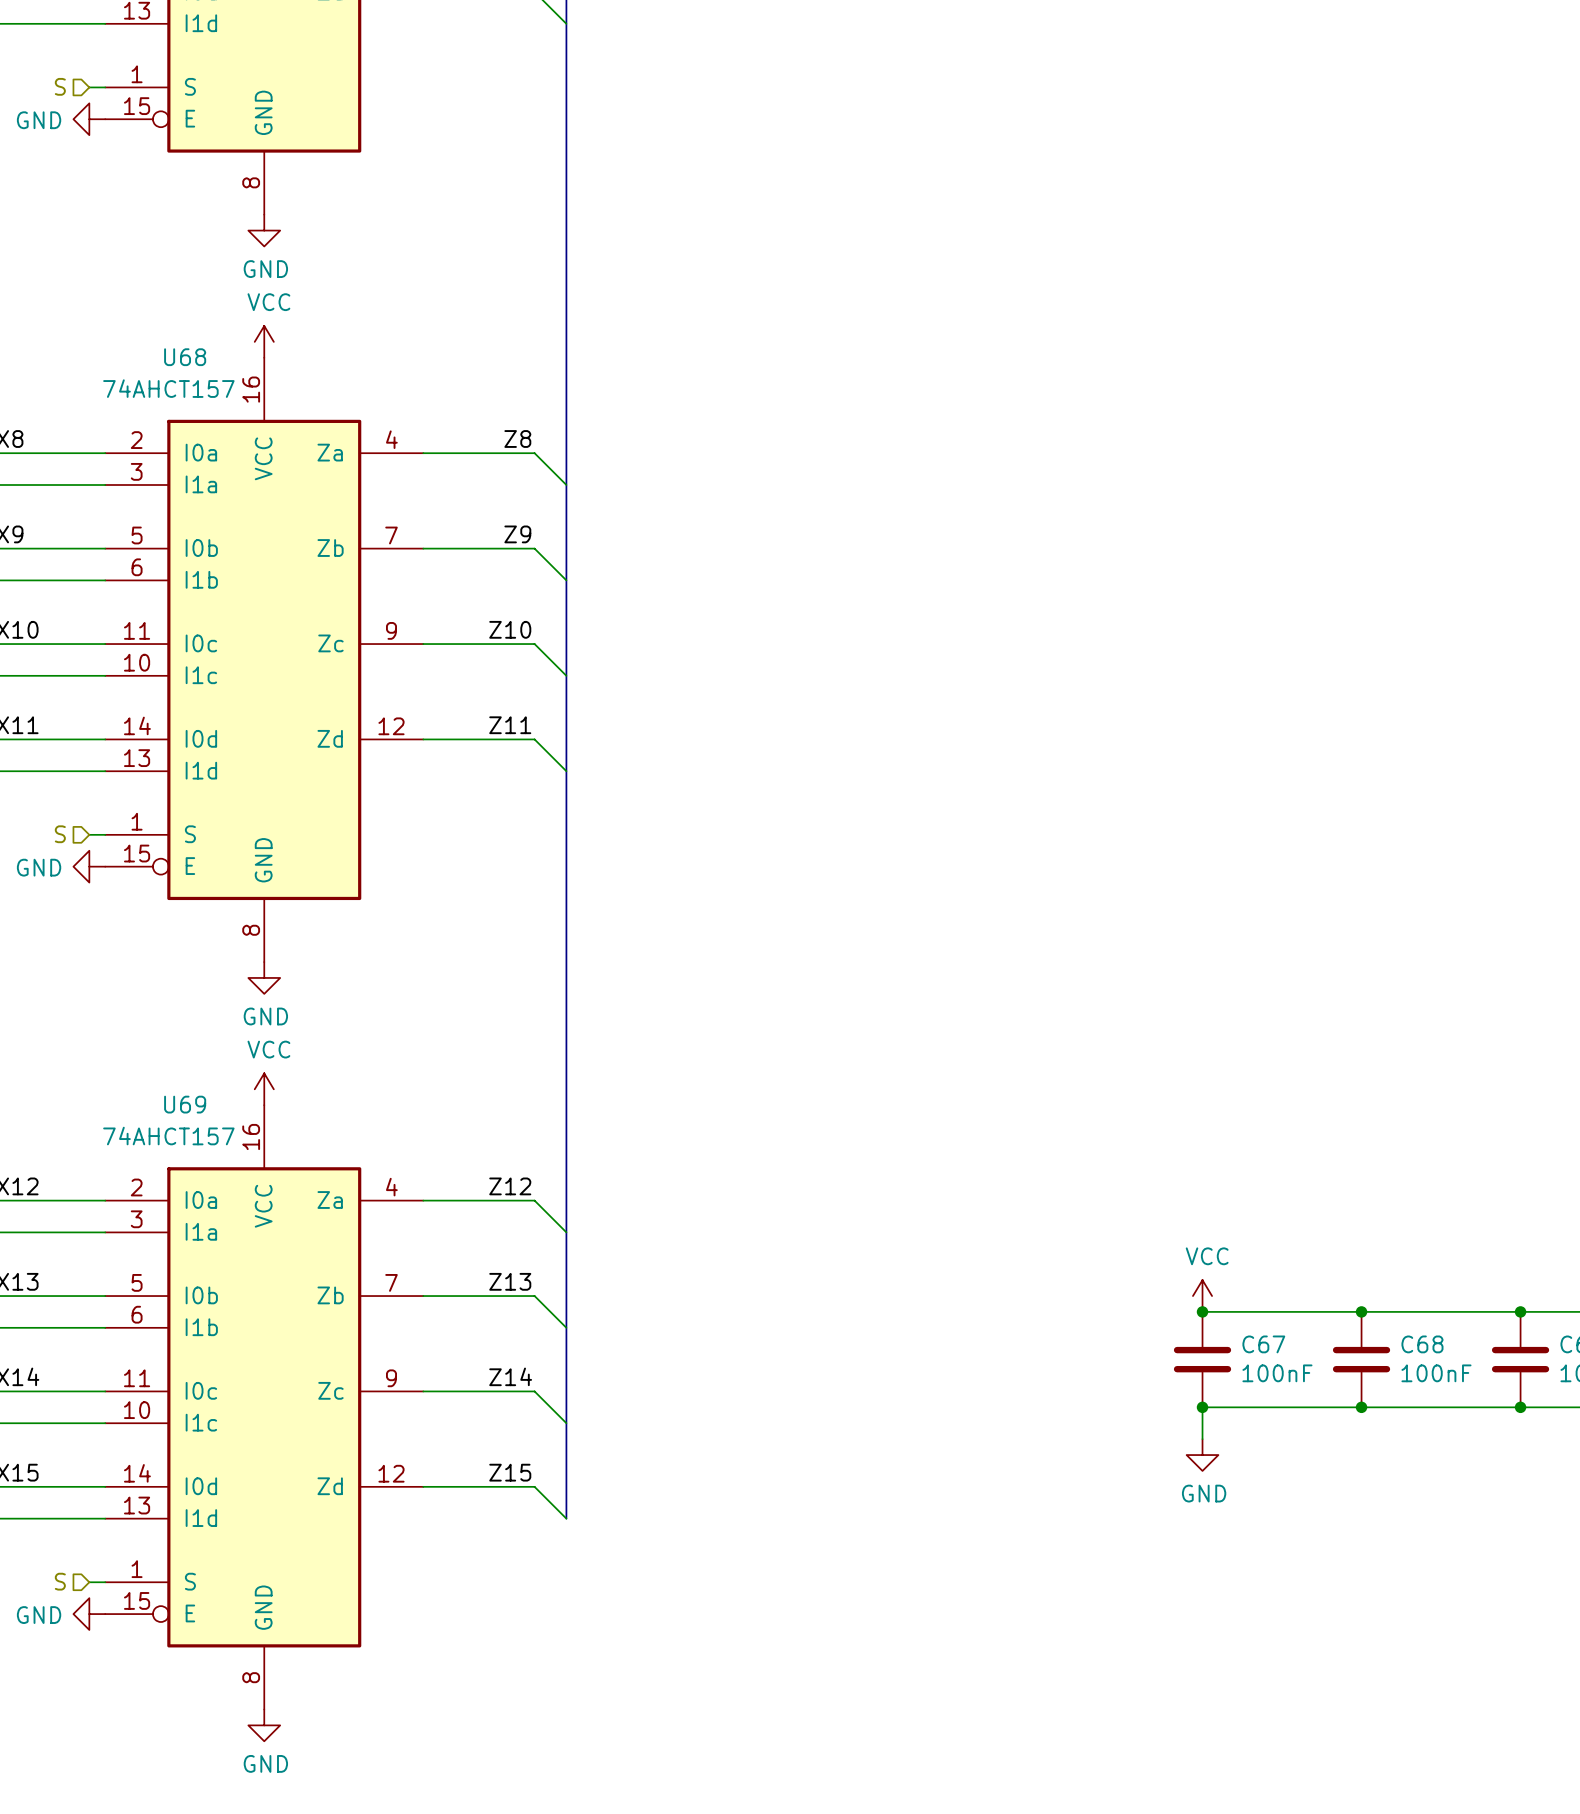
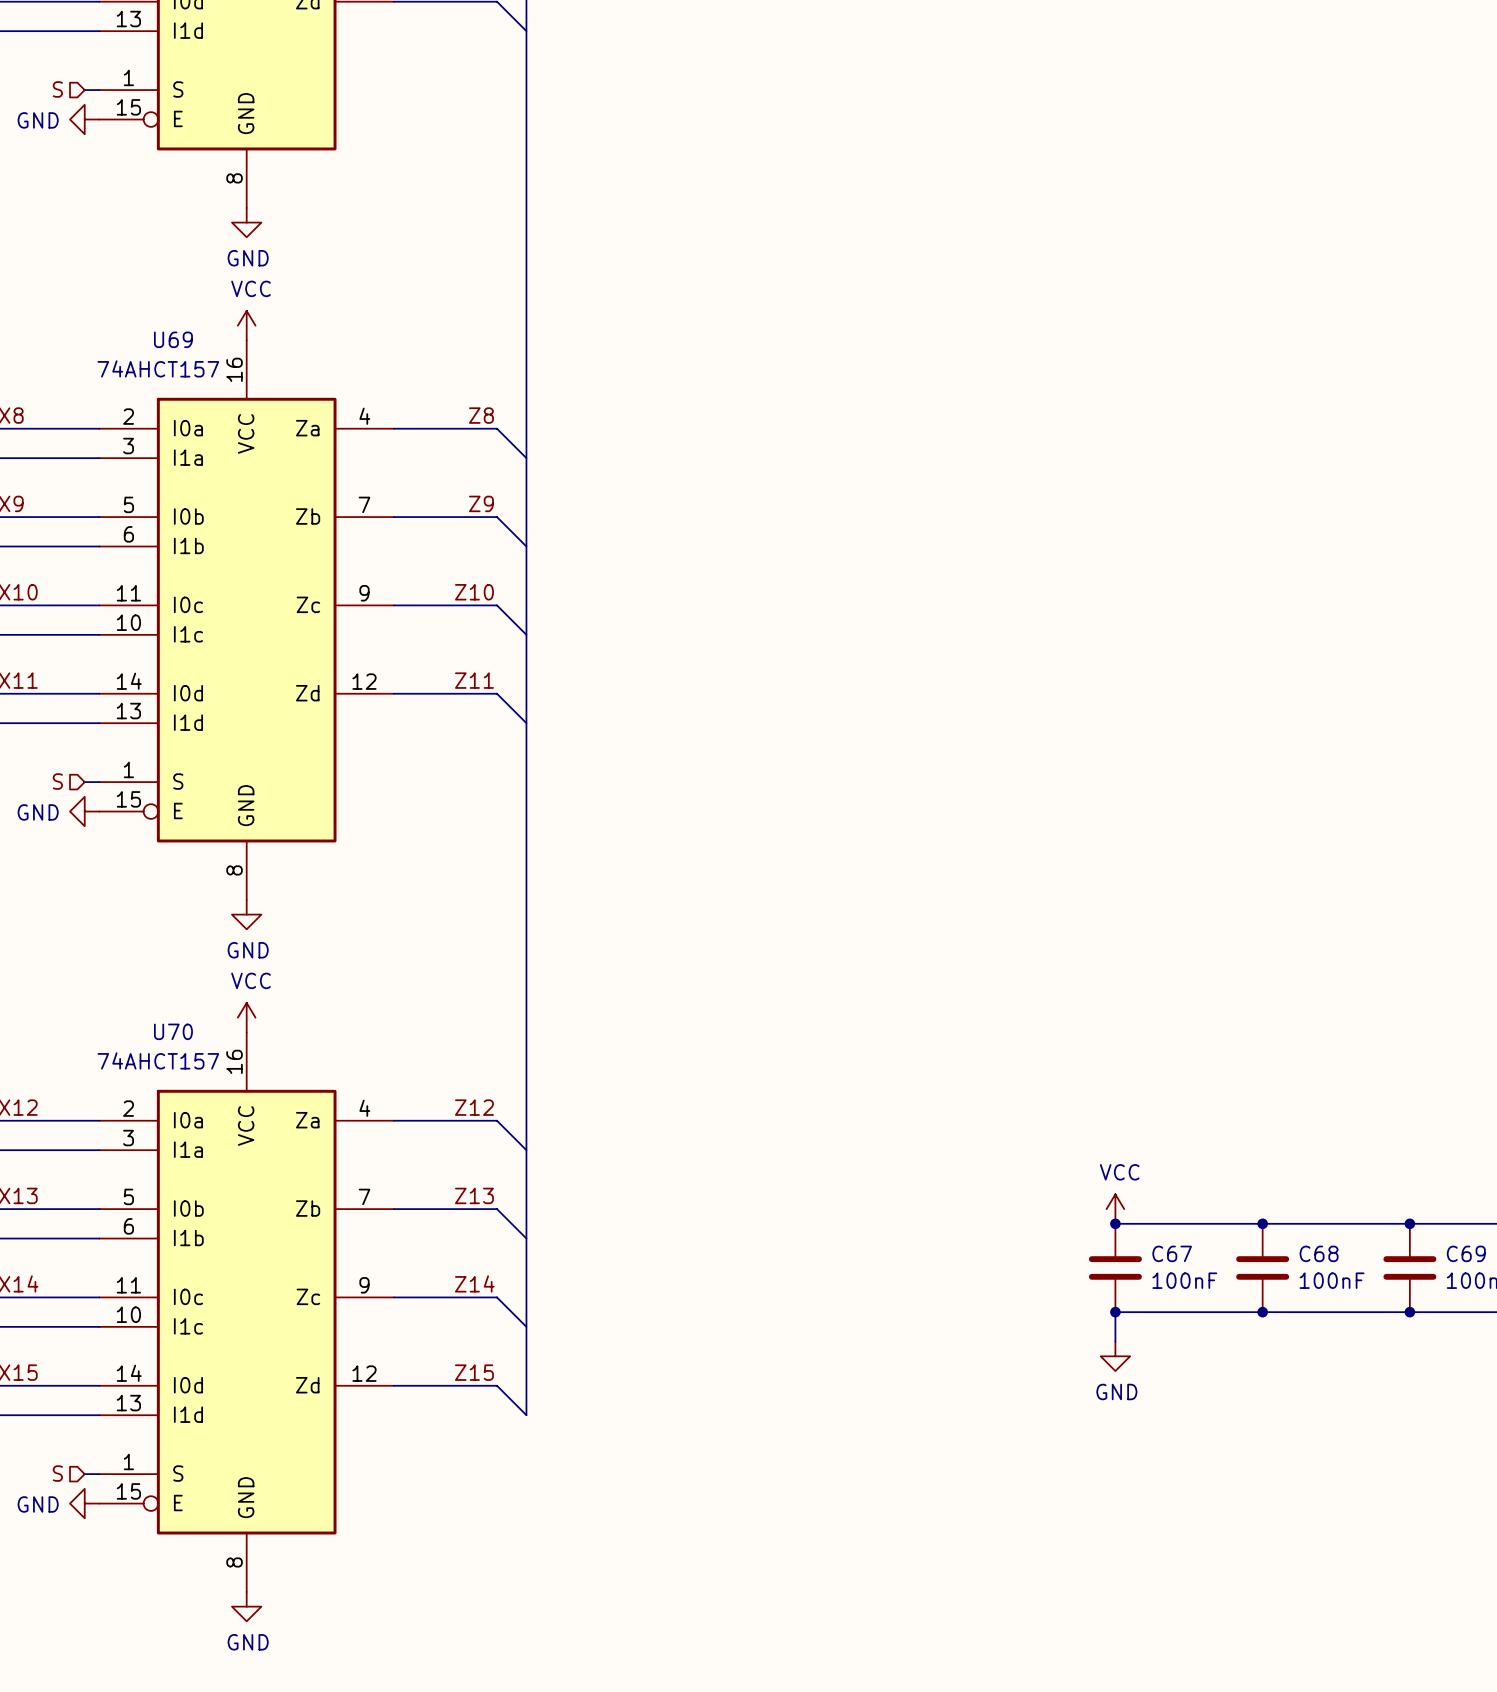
U68 name: U68 (185, 357) -> U69 (173, 339)
U69 name: U69 (185, 1104) -> U70 (173, 1031)

